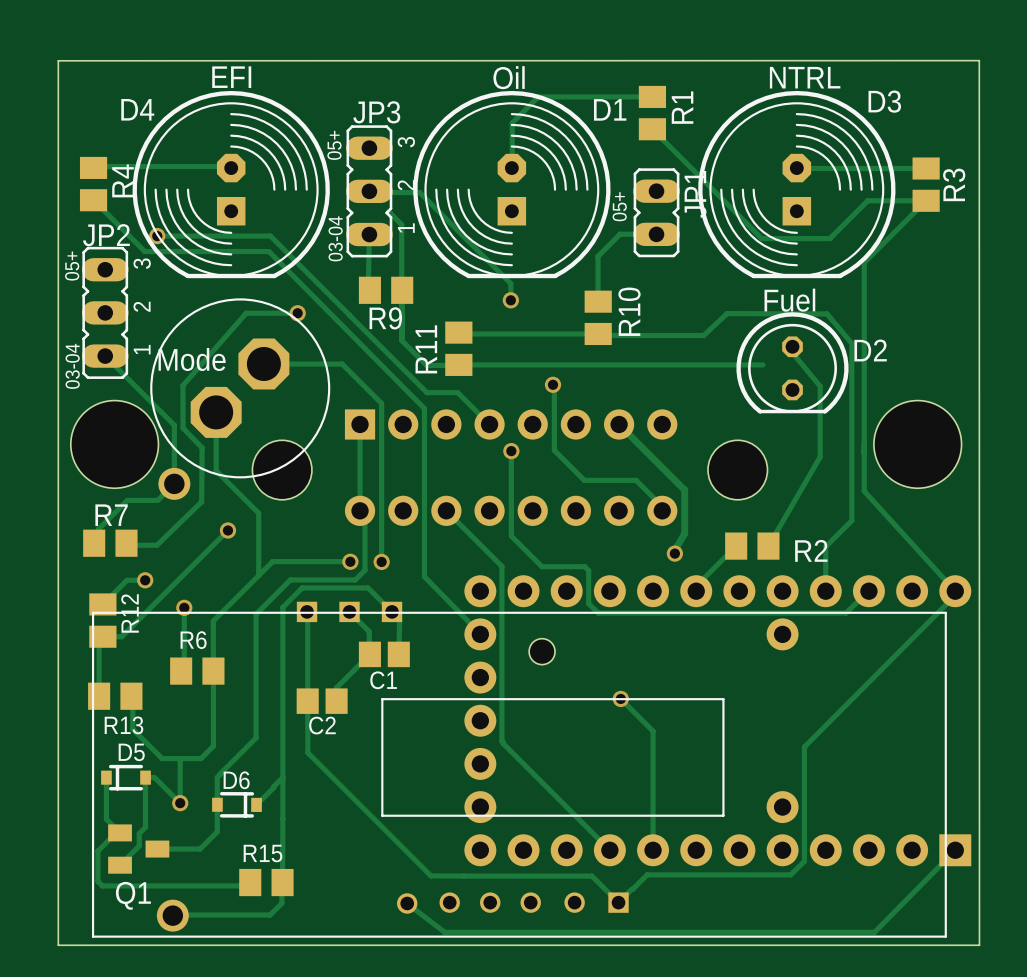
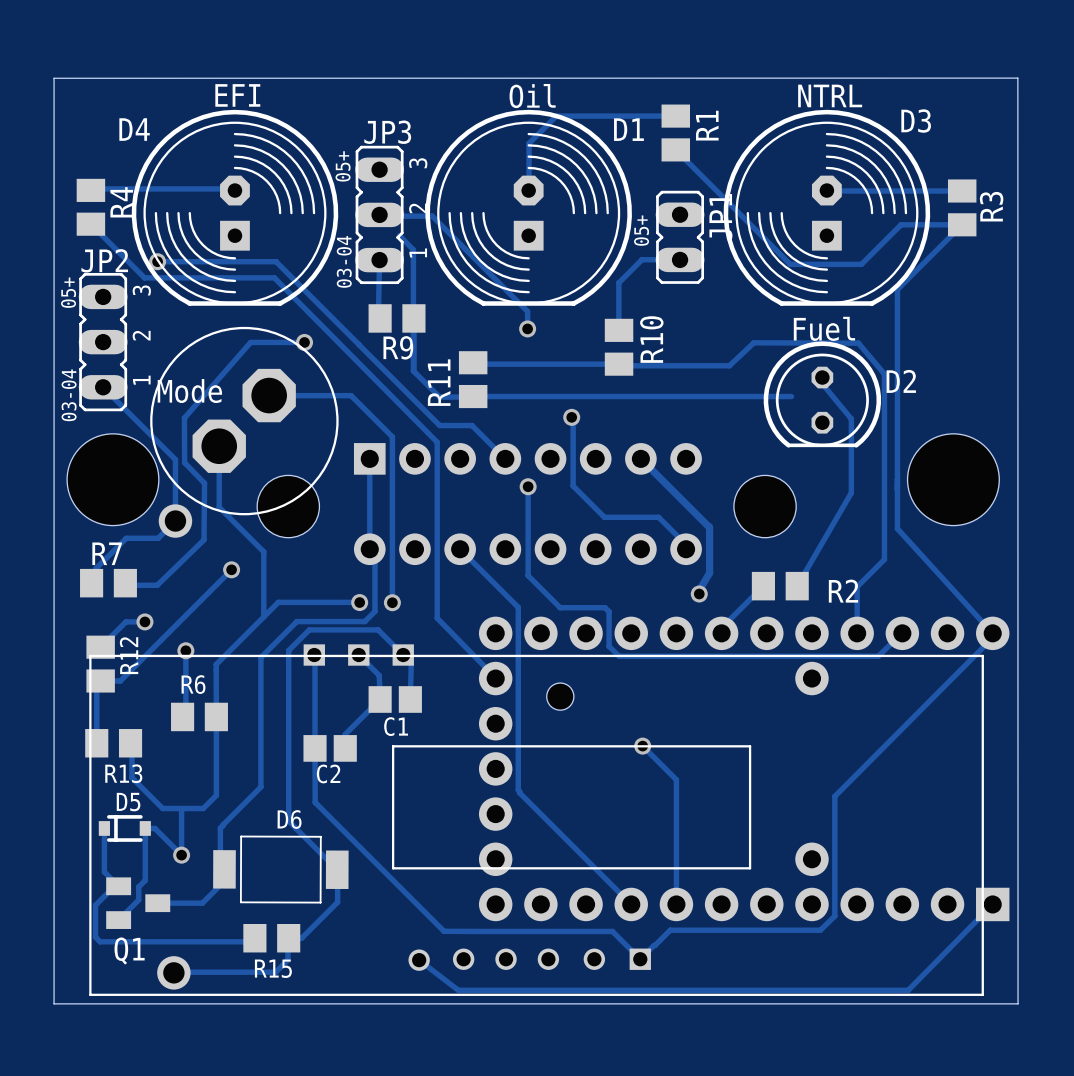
track: (282, 607) (282, 882) -> (289, 650) (288, 820) (295, 828)
track: (282, 777) (256, 804) -> none
track: none -> (295, 828) (337, 870) (337, 902) (301, 938) (288, 938)
D6 footprint: [212, 792, 262, 818] -> [213, 835, 349, 904]
R15 name position: R15 (262, 853) -> R15 (273, 968)

